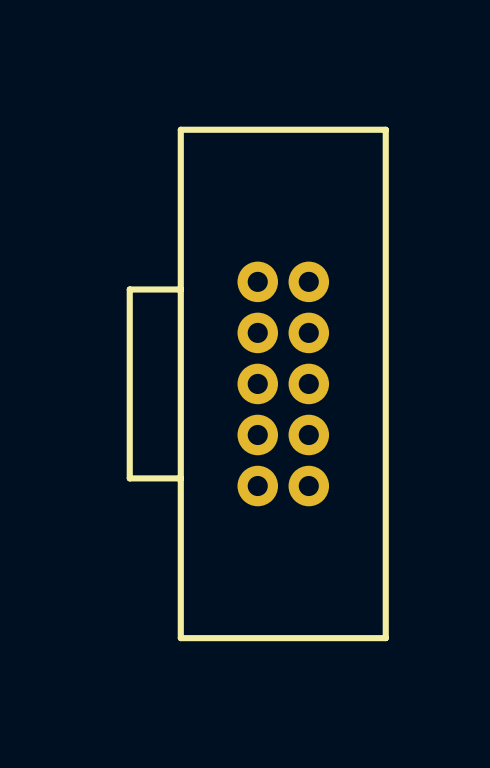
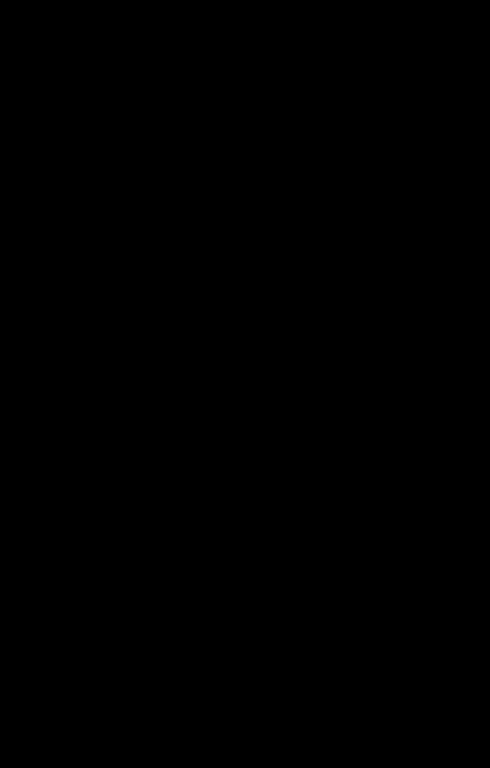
part: (257, 383) -> none

